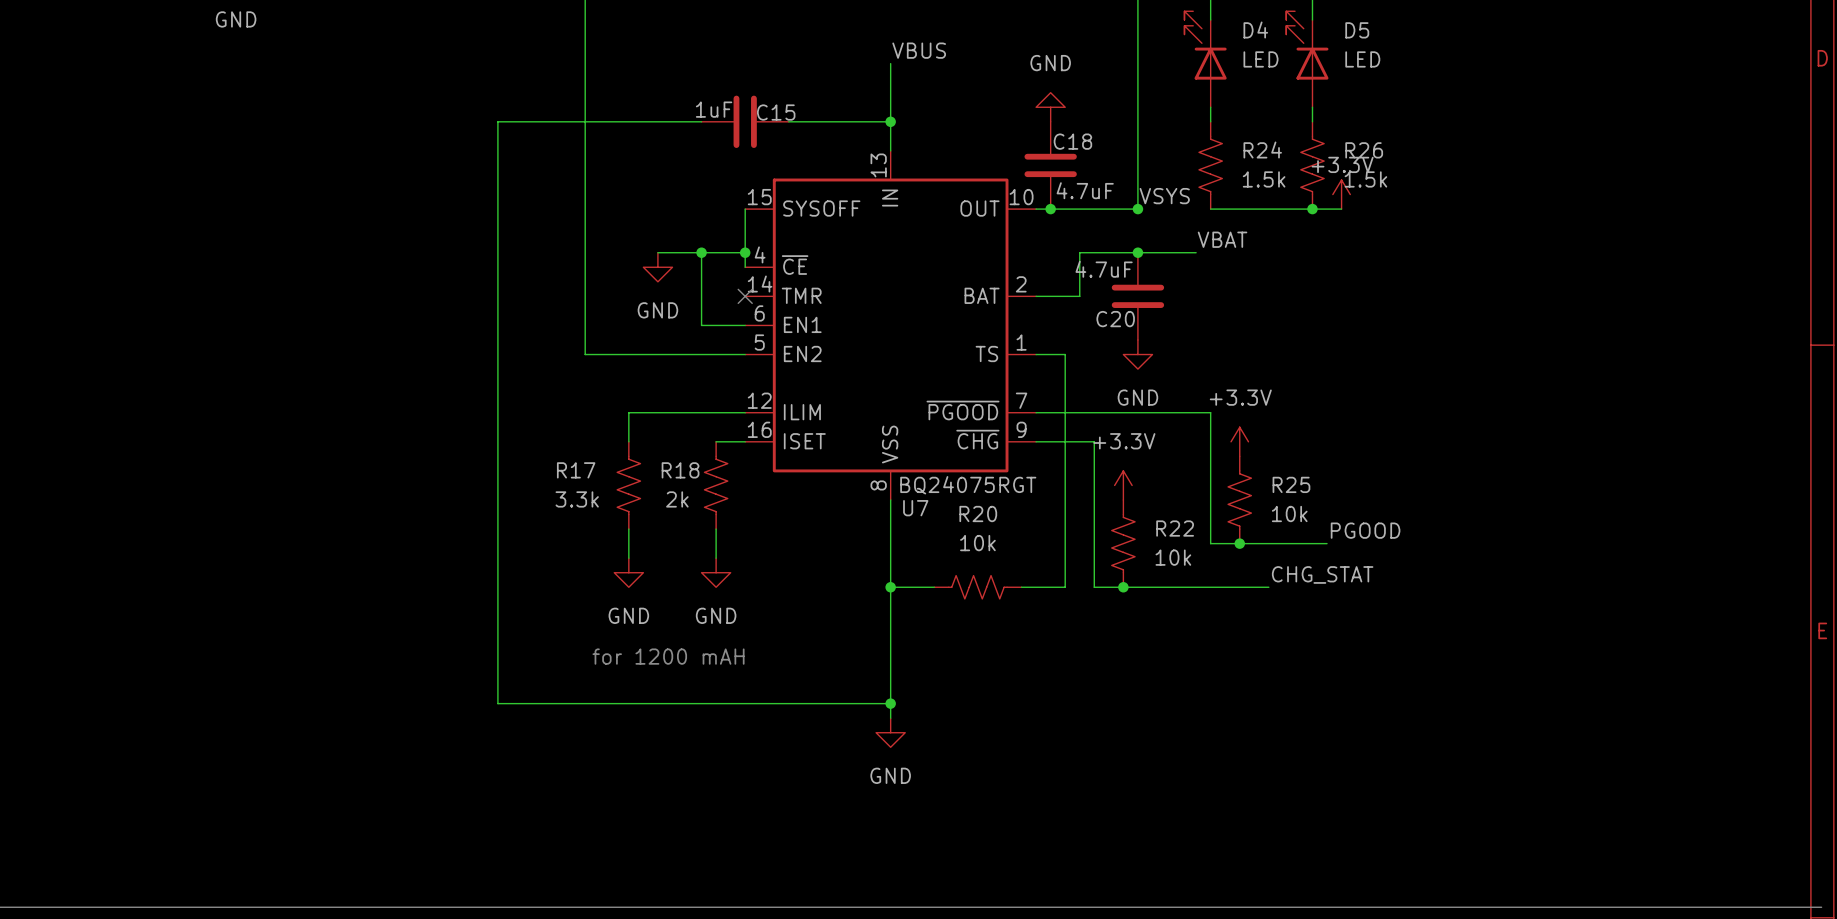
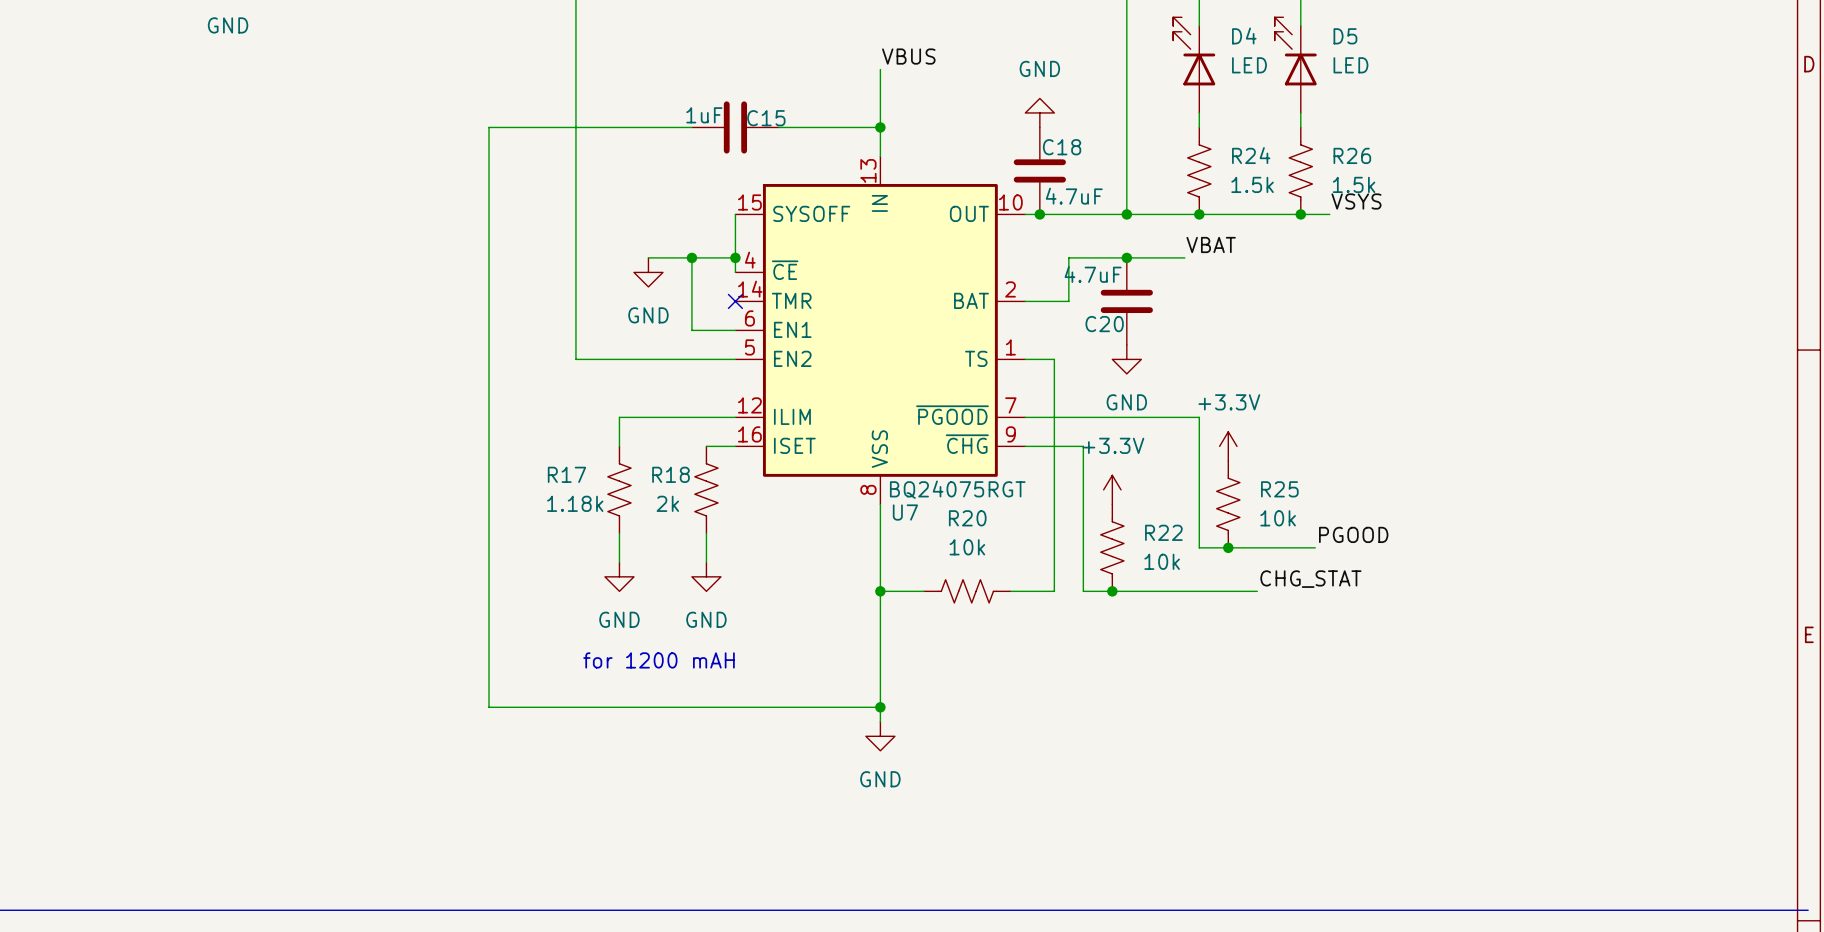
power symbol: +3.3V (1341, 194) -> none
label position: VSYS (1164, 196) -> VSYS (1356, 201)
wire: none -> (1126, 214) (1199, 214)
junction: none -> (1199, 214)
R17 value: 3.3k (577, 499) -> 1.18k (575, 503)

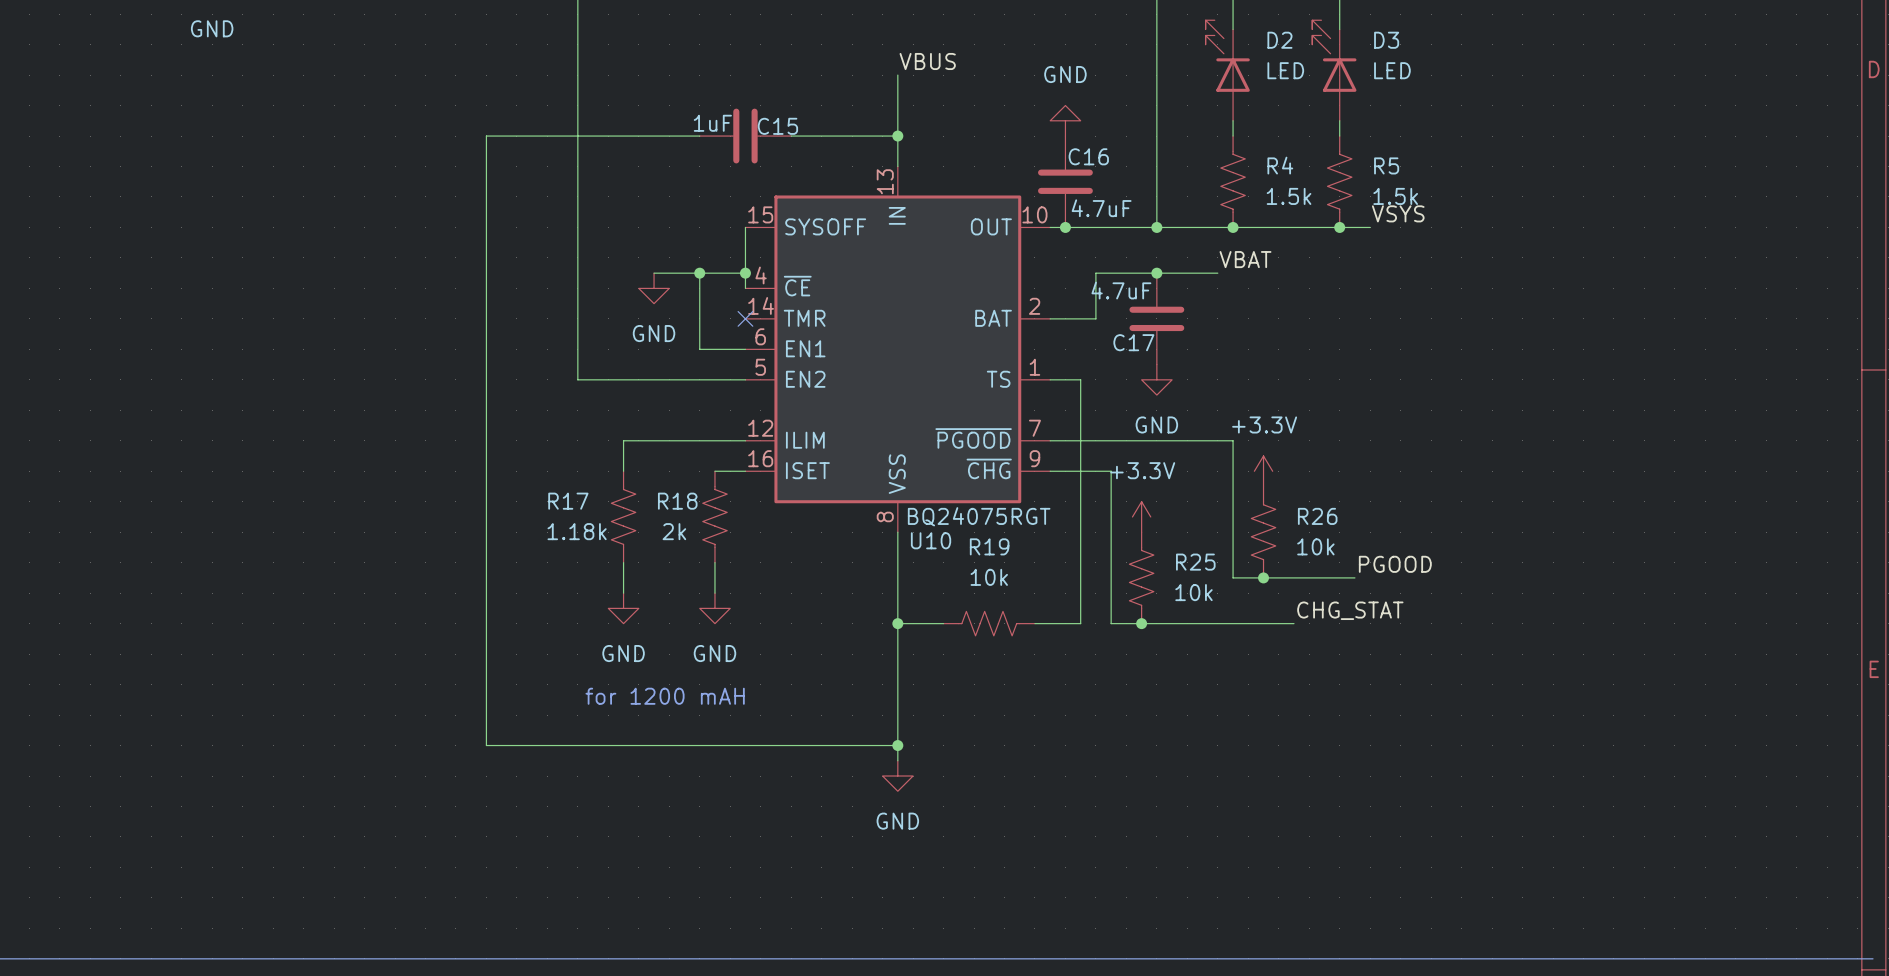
D4 name: D4 (1244, 35) -> D2 (1279, 40)
D5 name: D5 (1345, 36) -> D3 (1386, 40)
C18 name: C18 (1062, 147) -> C16 (1088, 156)
R24 name: R24 (1251, 155) -> R4 (1280, 165)
R26 name: R26 (1352, 155) -> R5 (1386, 165)
C20 name: C20 (1104, 324) -> C17 (1133, 342)
R25 name: R25 (1279, 489) -> R26 (1317, 516)
U7 name: U7 (905, 512) -> U10 (931, 540)
R20 name: R20 (967, 518) -> R19 (989, 546)
R22 name: R22 (1163, 532) -> R25 (1195, 562)

